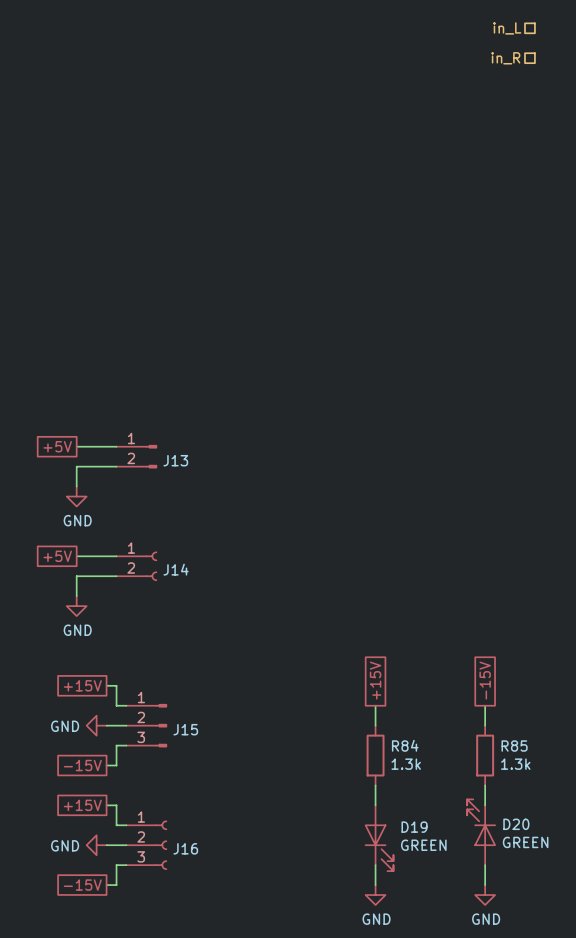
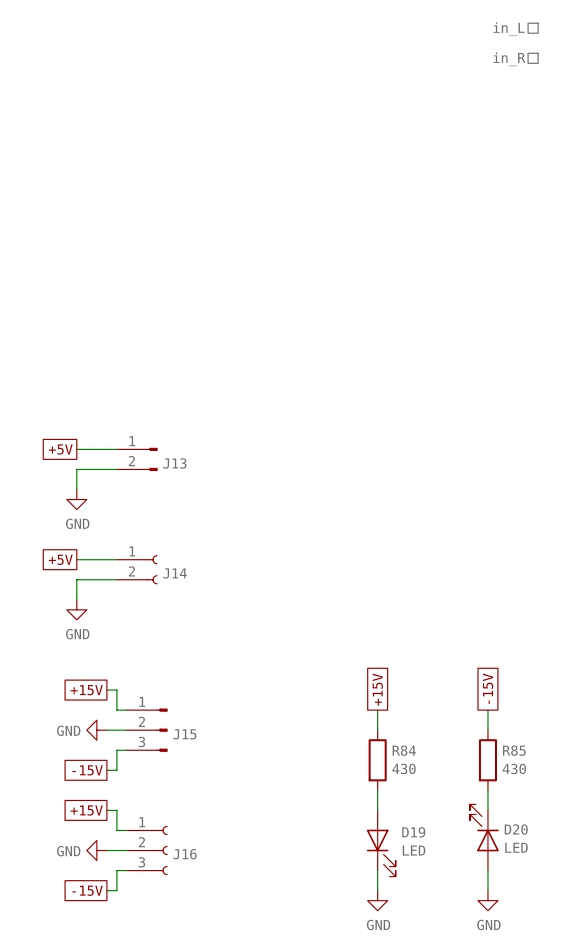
R84 value: 1.3k (406, 764) -> 430 (404, 768)
R85 value: 1.3k (515, 764) -> 430 (514, 768)
D20 value: GREEN (525, 842) -> LED (516, 847)
D19 value: GREEN (423, 845) -> LED (414, 850)

